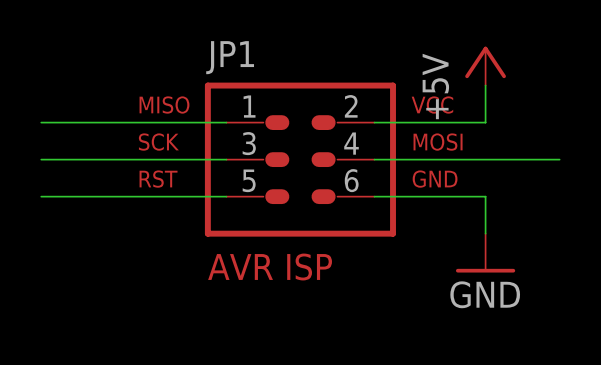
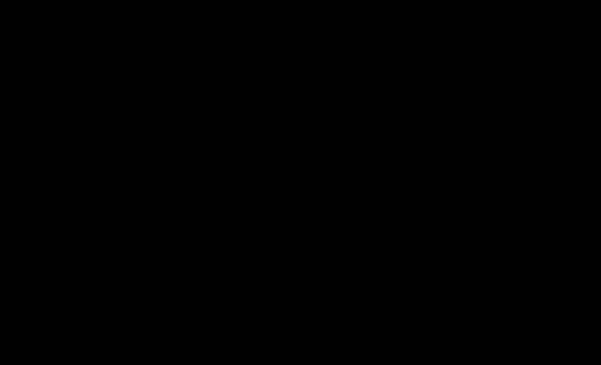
power symbol: +5V (485, 66) -> none
wire: (485, 85) (485, 122) (374, 122) -> none
wire: (41, 122) (226, 122) -> none
wire: (41, 159) (226, 159) -> none
JP1: (300, 159) -> none
wire: (374, 159) (559, 159) -> none
wire: (41, 196) (226, 196) -> none
wire: (374, 196) (485, 196) (485, 233) -> none
power symbol: GND (485, 253) -> none

